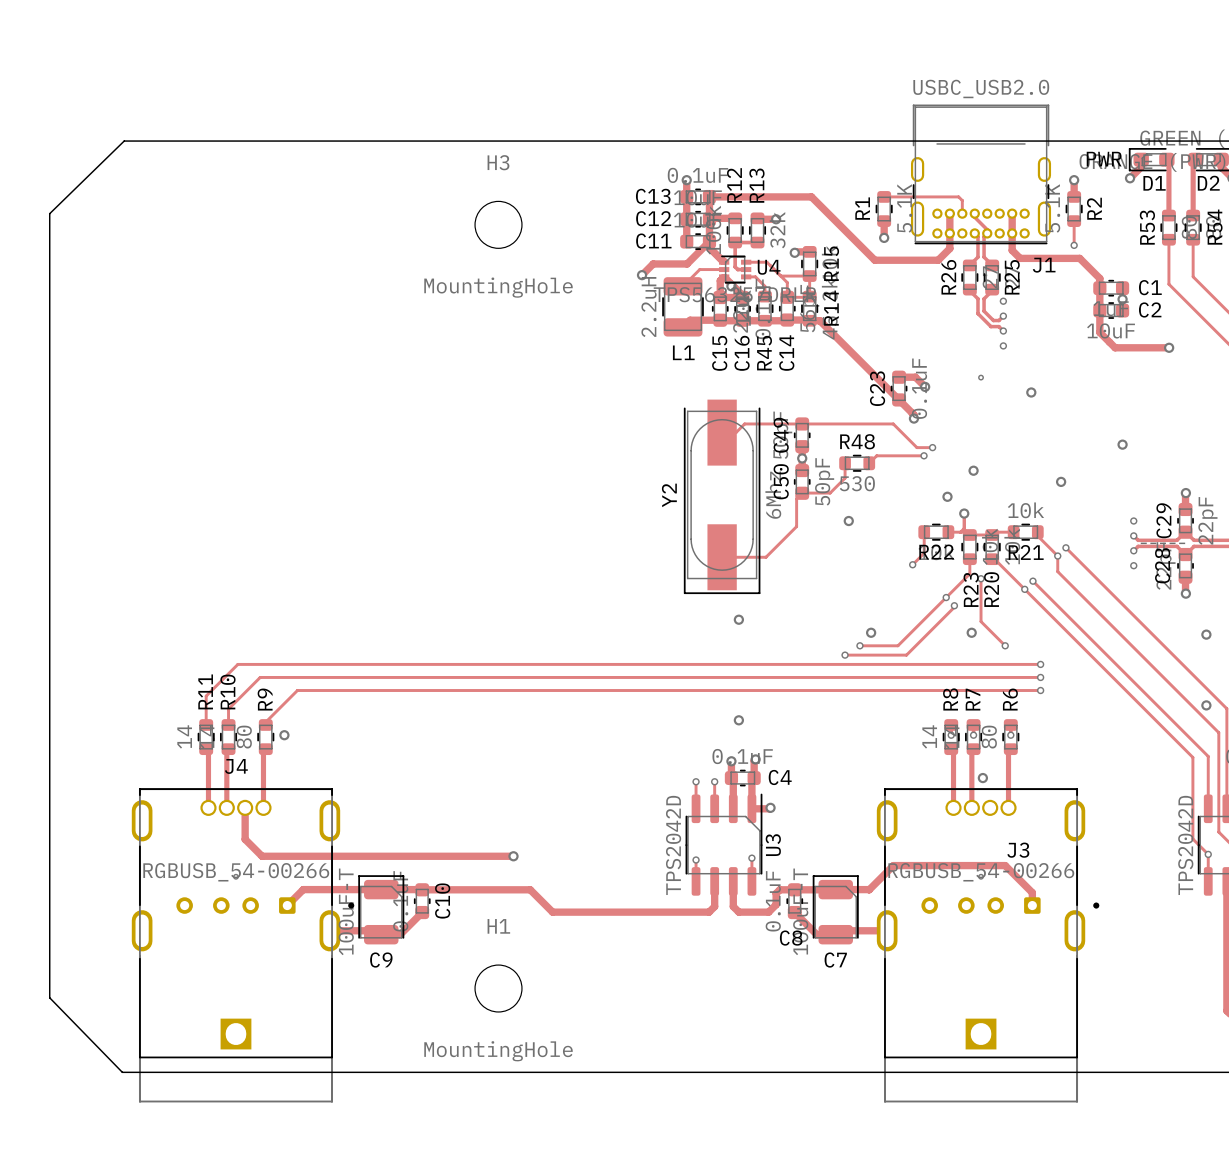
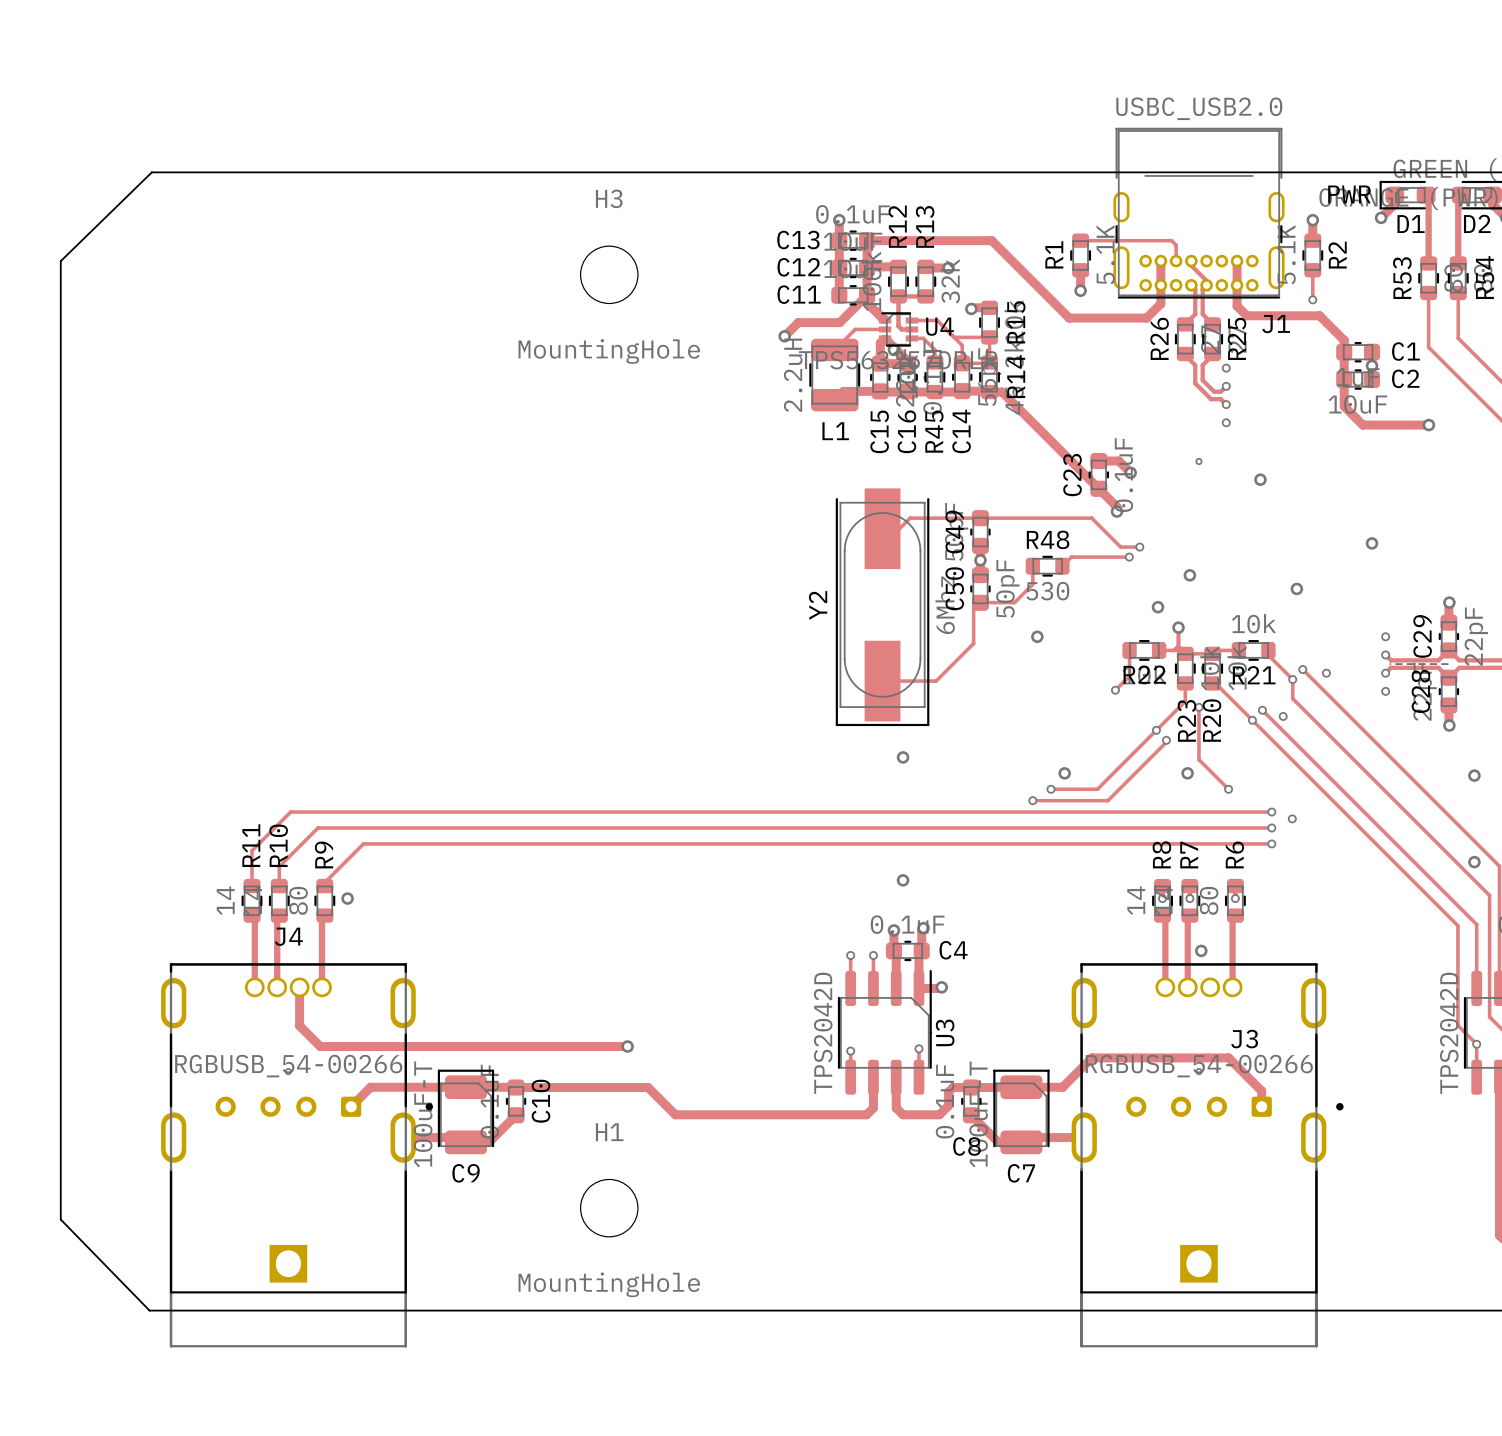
via: none -> (1326, 673)
via: none -> (1283, 716)
via: none -> (1292, 818)

